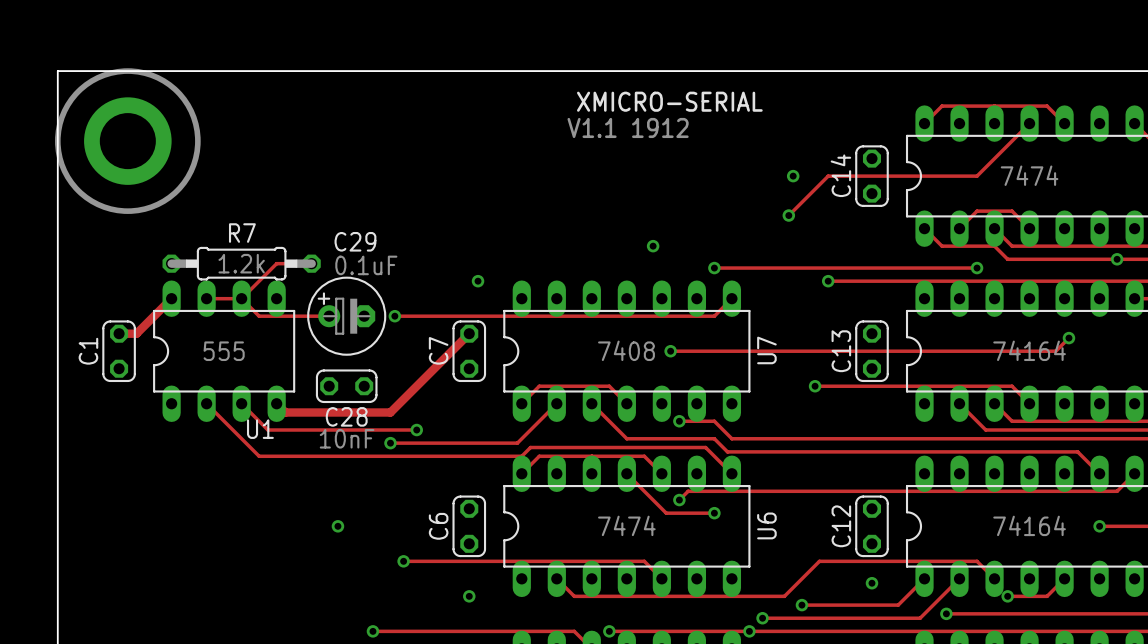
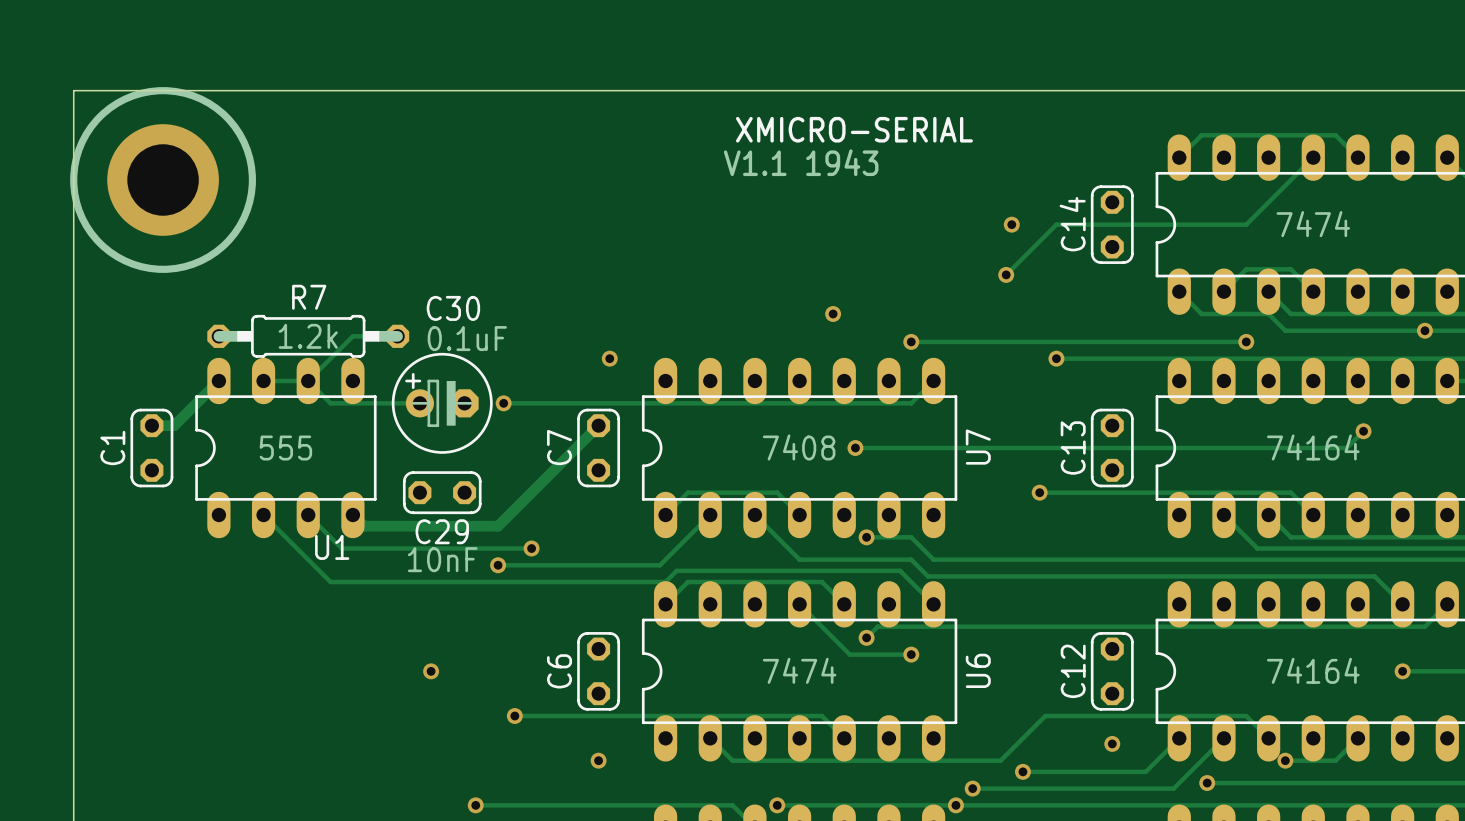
text: V1.1 1912 (628, 127) -> V1.1 1943 (801, 162)
C29 name: C29 (355, 241) -> C30 (453, 308)
C28 name: C28 (346, 416) -> C29 (442, 531)

